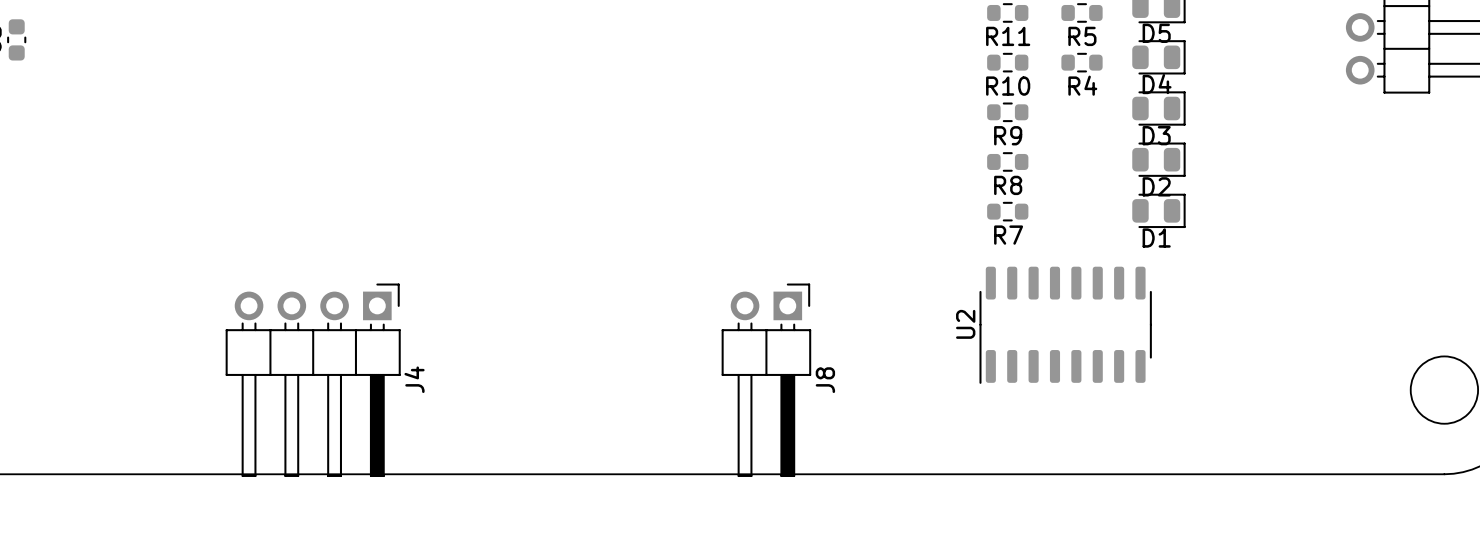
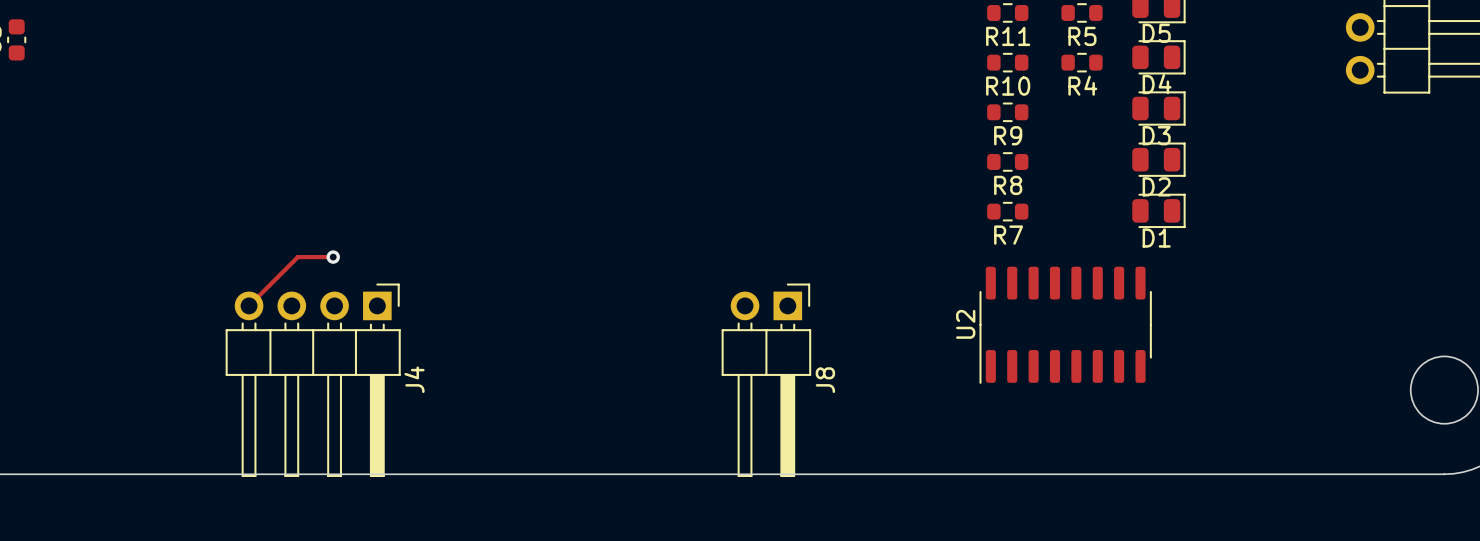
track: none -> (333, 257) (297, 257) (249, 305)
via: none -> (333, 257)

